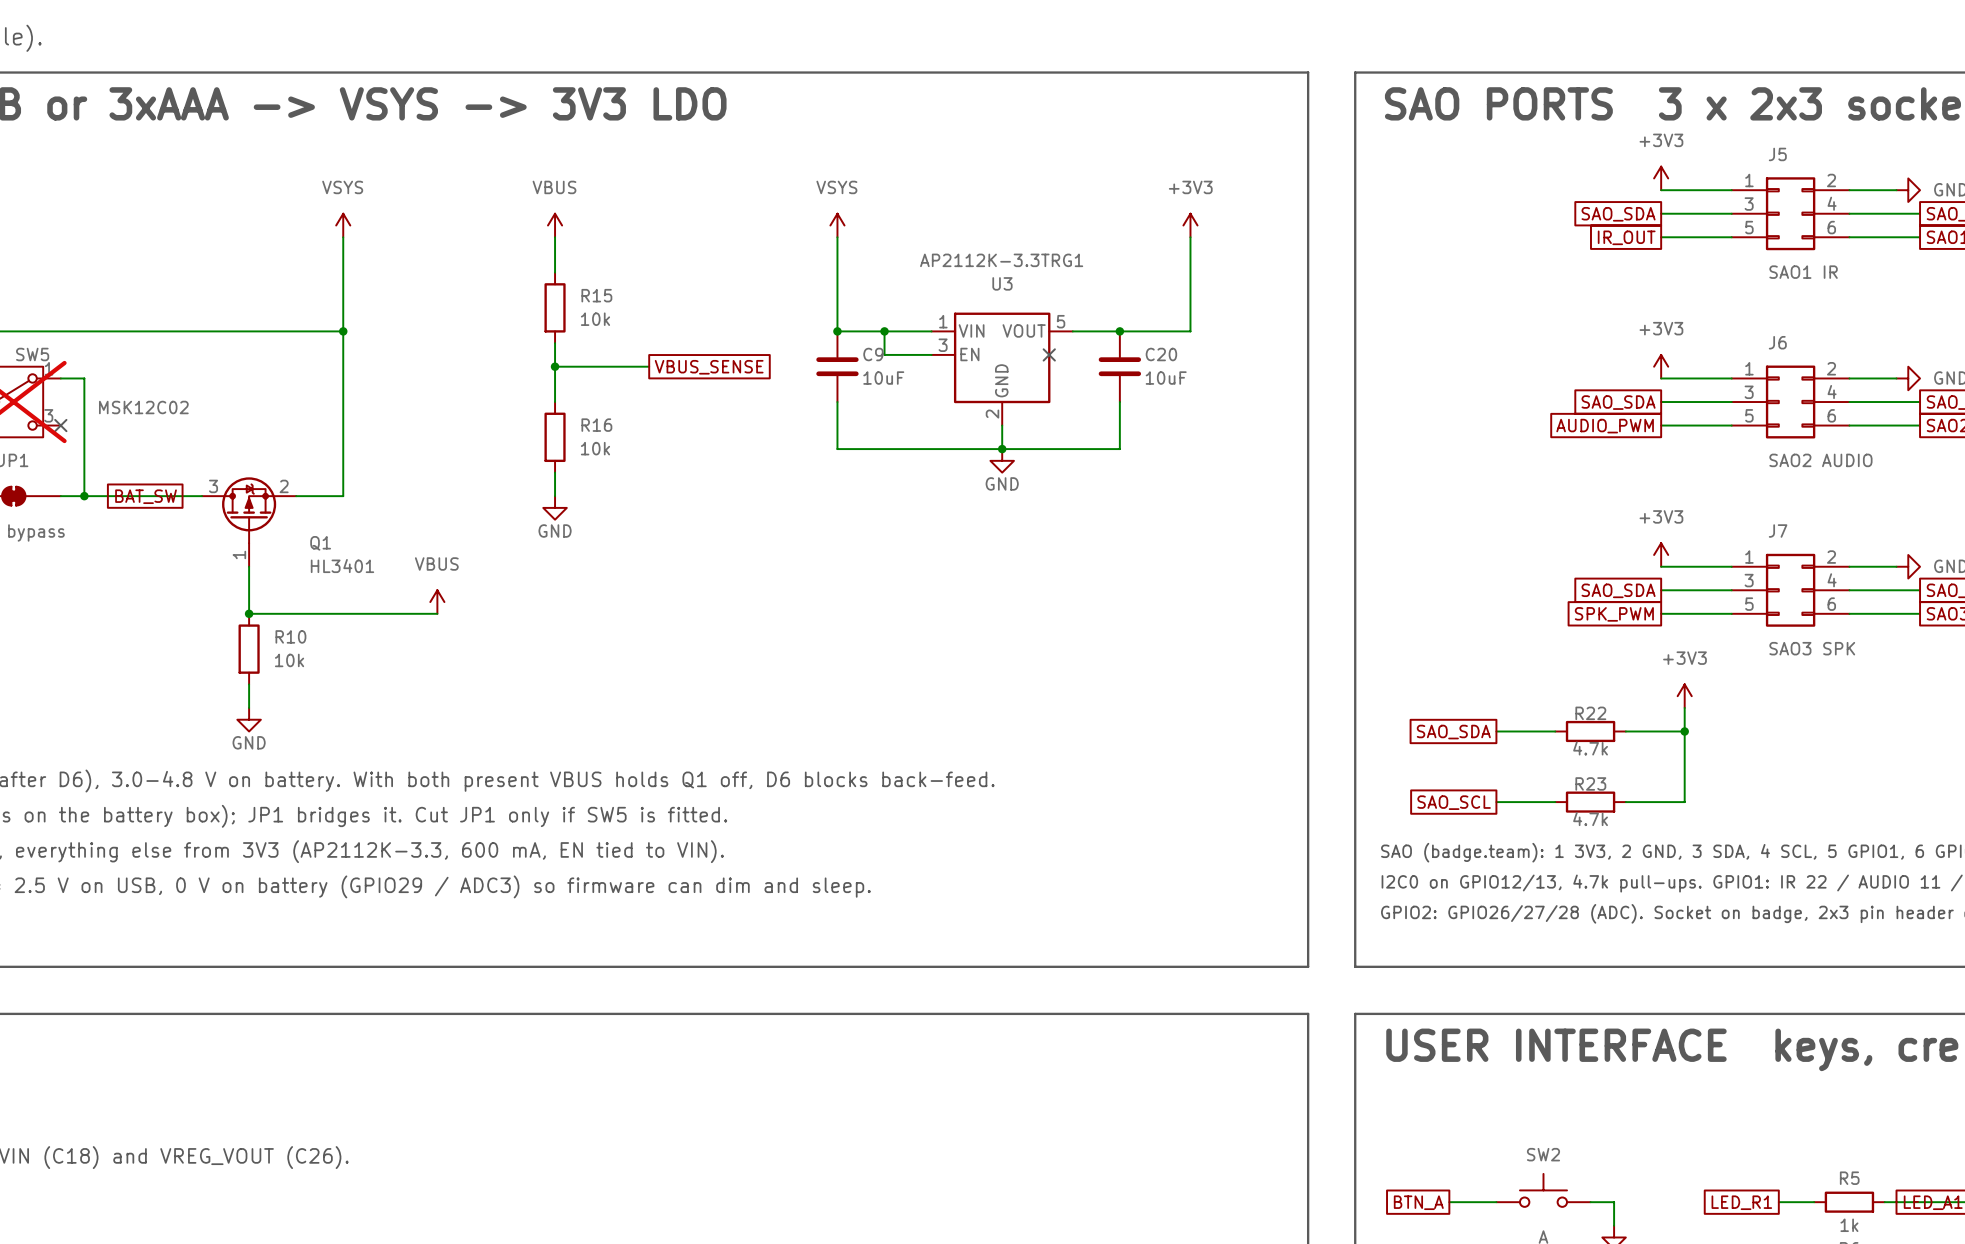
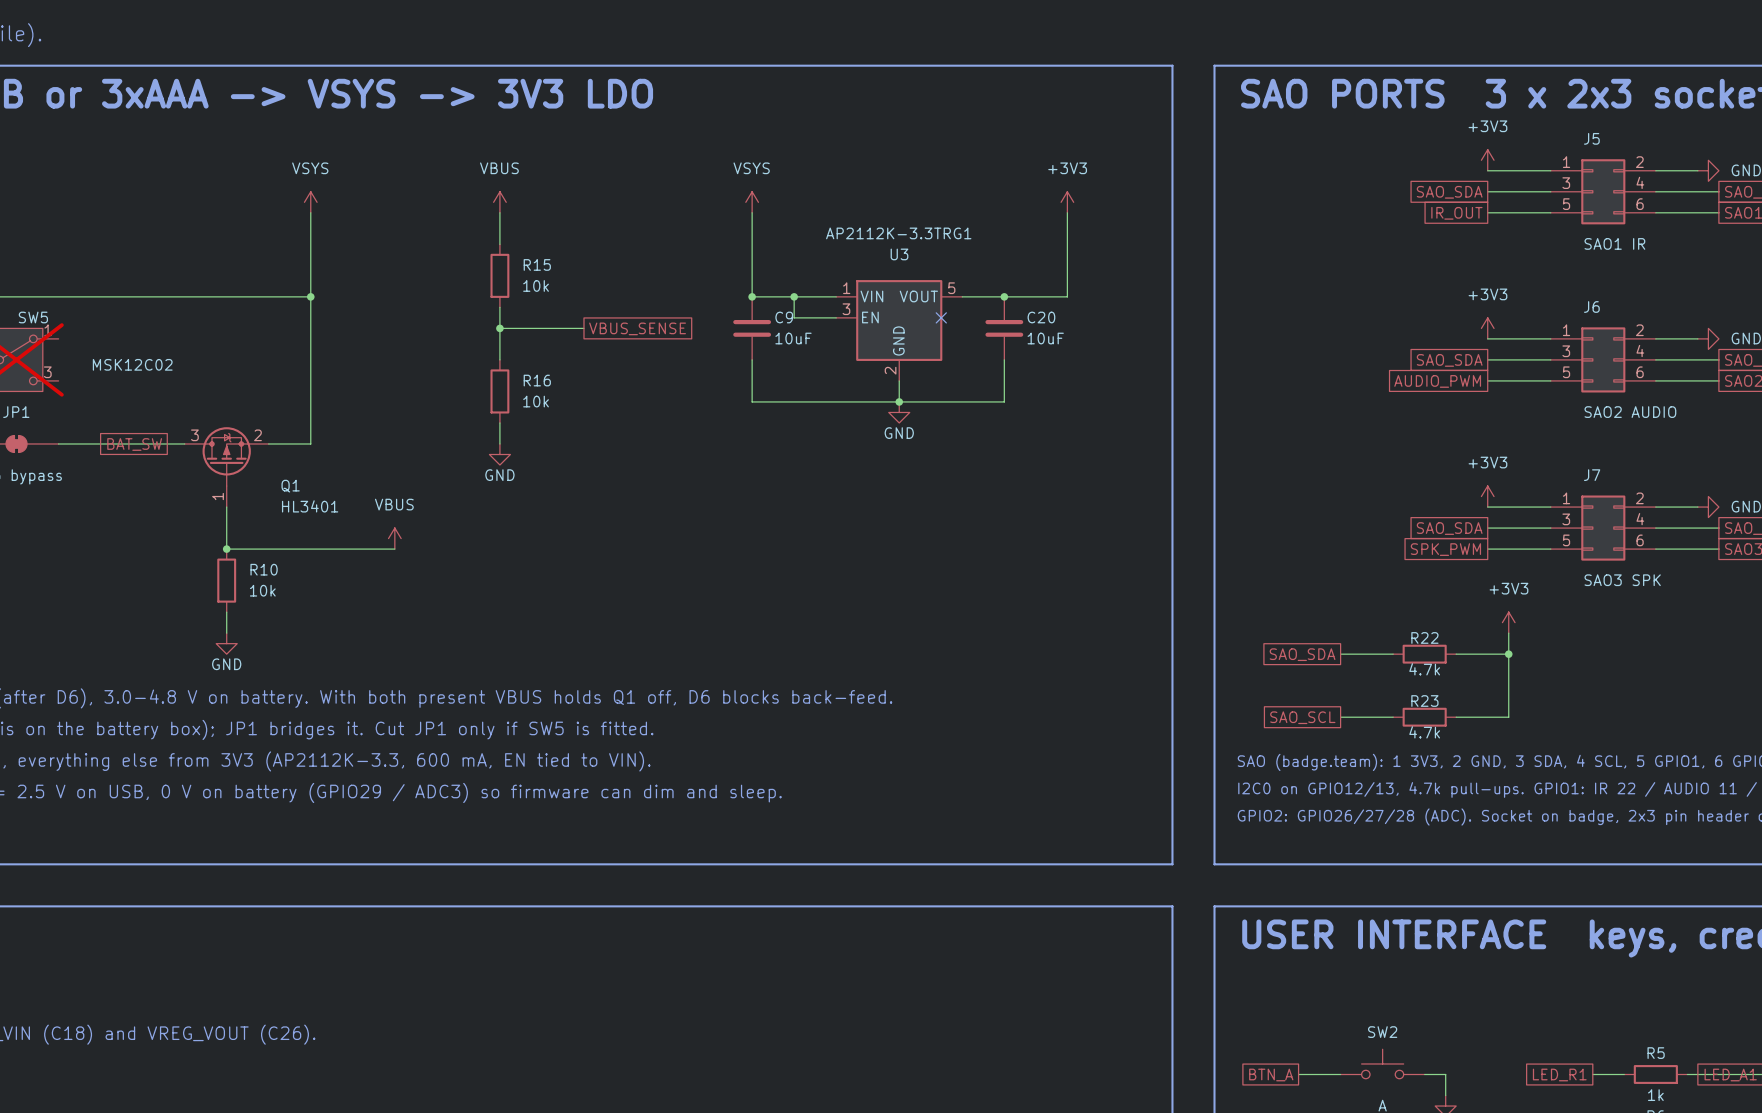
wire: (60, 378) (84, 378) (84, 496) -> none
no-connect mark: (60, 425) -> none
junction: (84, 496) -> none

